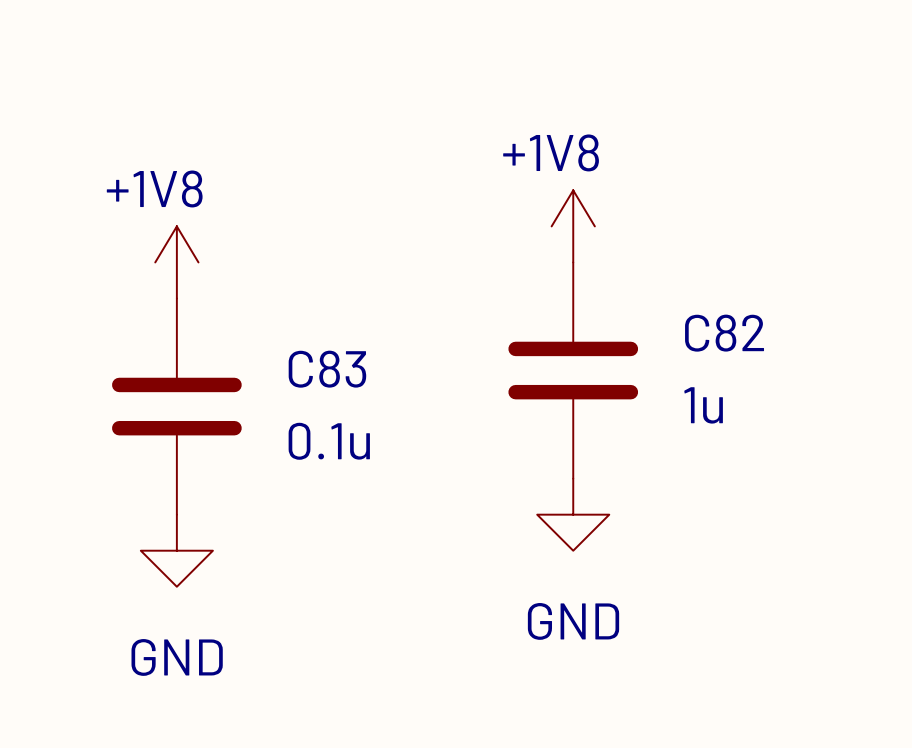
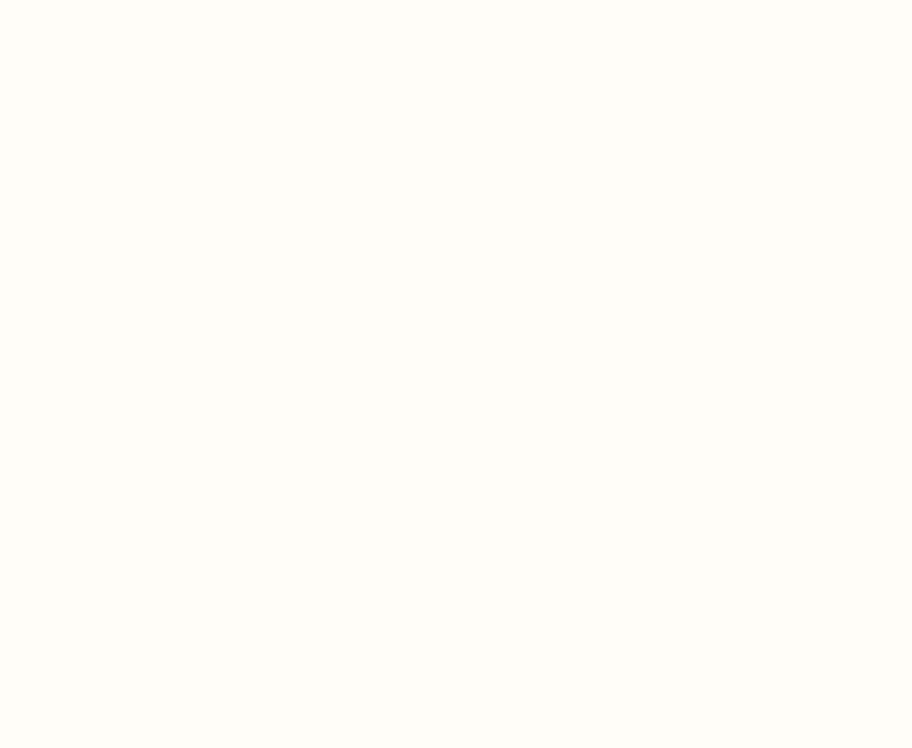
power symbol: +1V8 (573, 226) -> none
power symbol: +1V8 (176, 262) -> none
C82: 1u (573, 370) -> none
C83: 0.1u (176, 406) -> none
power symbol: GND (573, 514) -> none
power symbol: GND (176, 550) -> none

